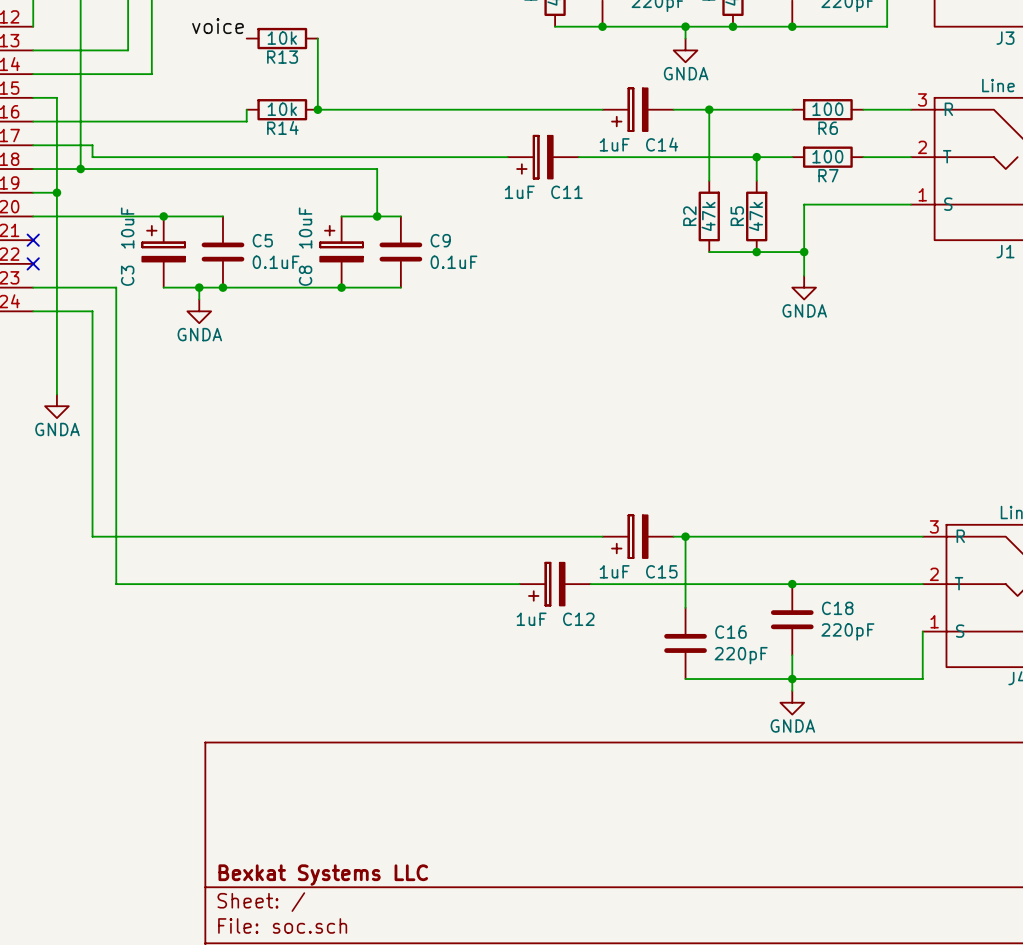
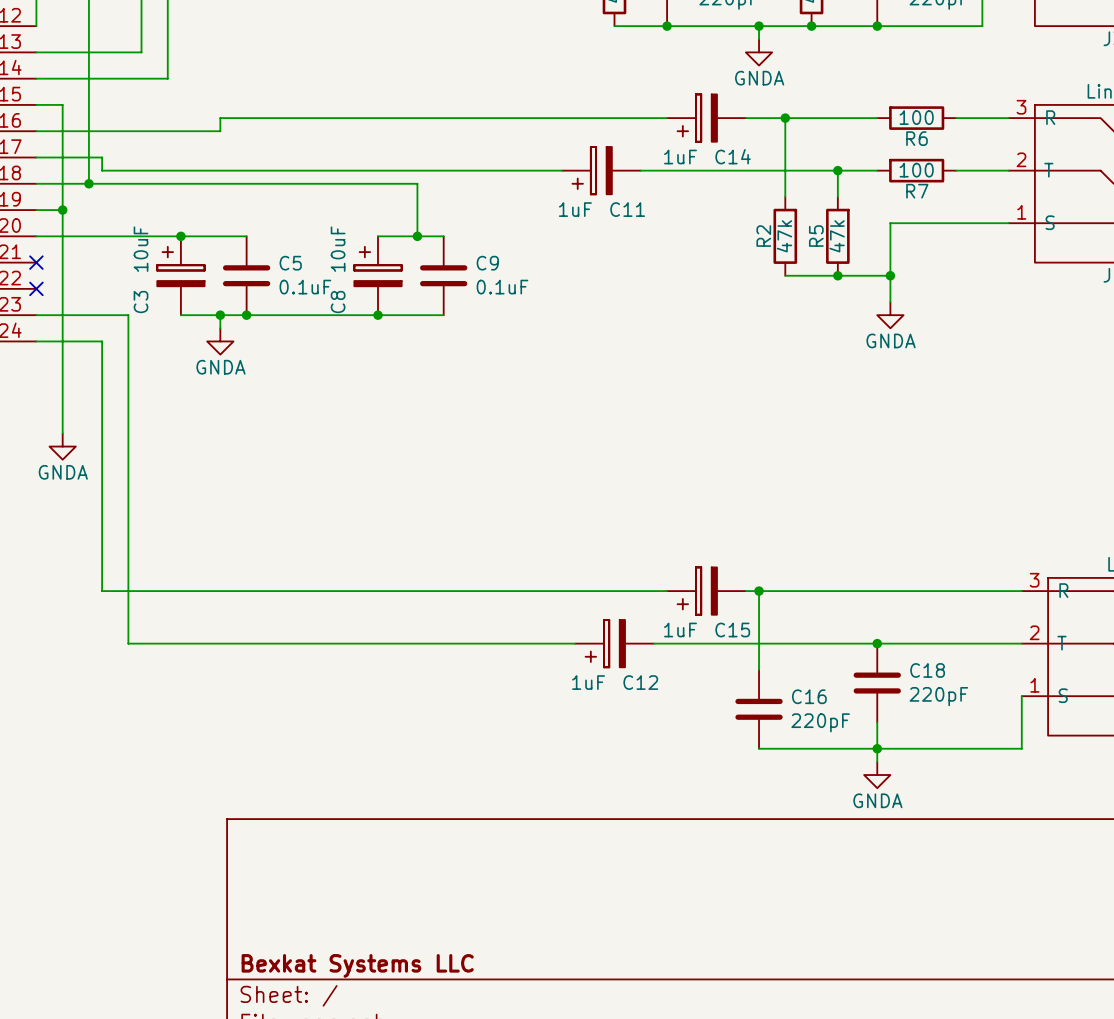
label: voice (217, 26) -> none
R13: 10k (282, 38) -> none
wire: (317, 38) (317, 109) -> none
wire: (246, 109) (246, 121) (199, 121) -> (351, 118) (220, 118) (220, 131)
R14: 10k (282, 109) -> none
junction: (317, 109) -> none

